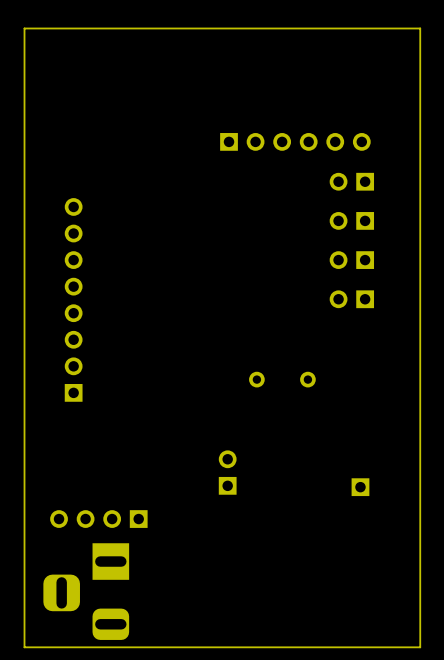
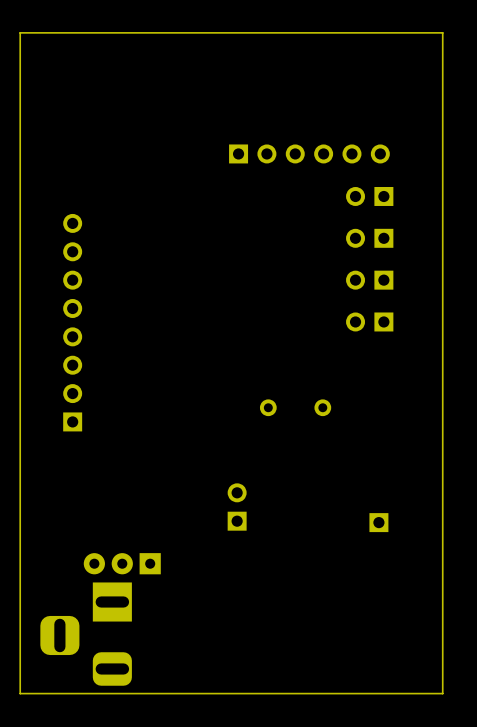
part: (98, 519) -> none
part: none -> (122, 563)

